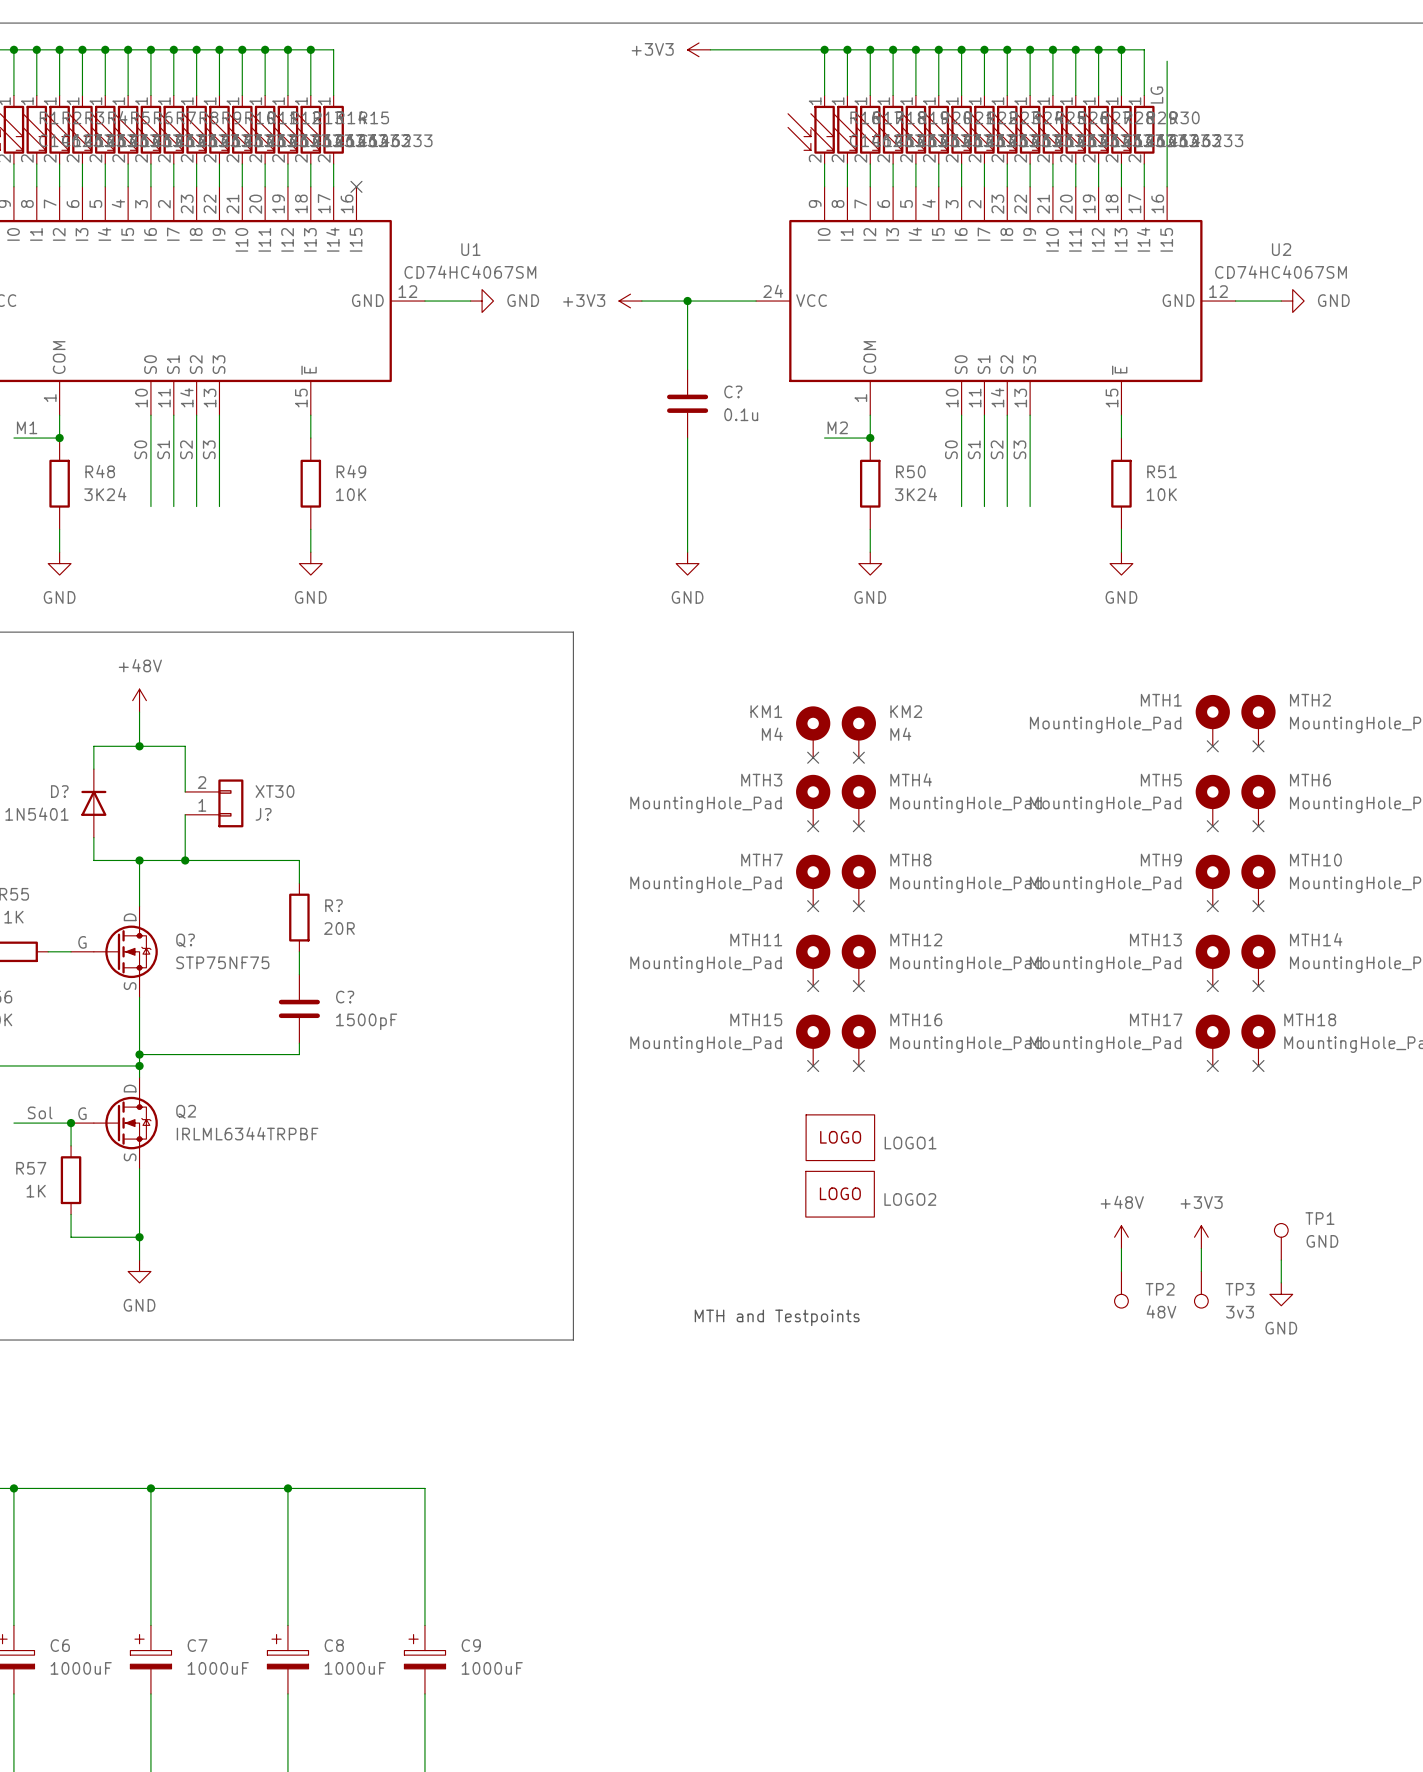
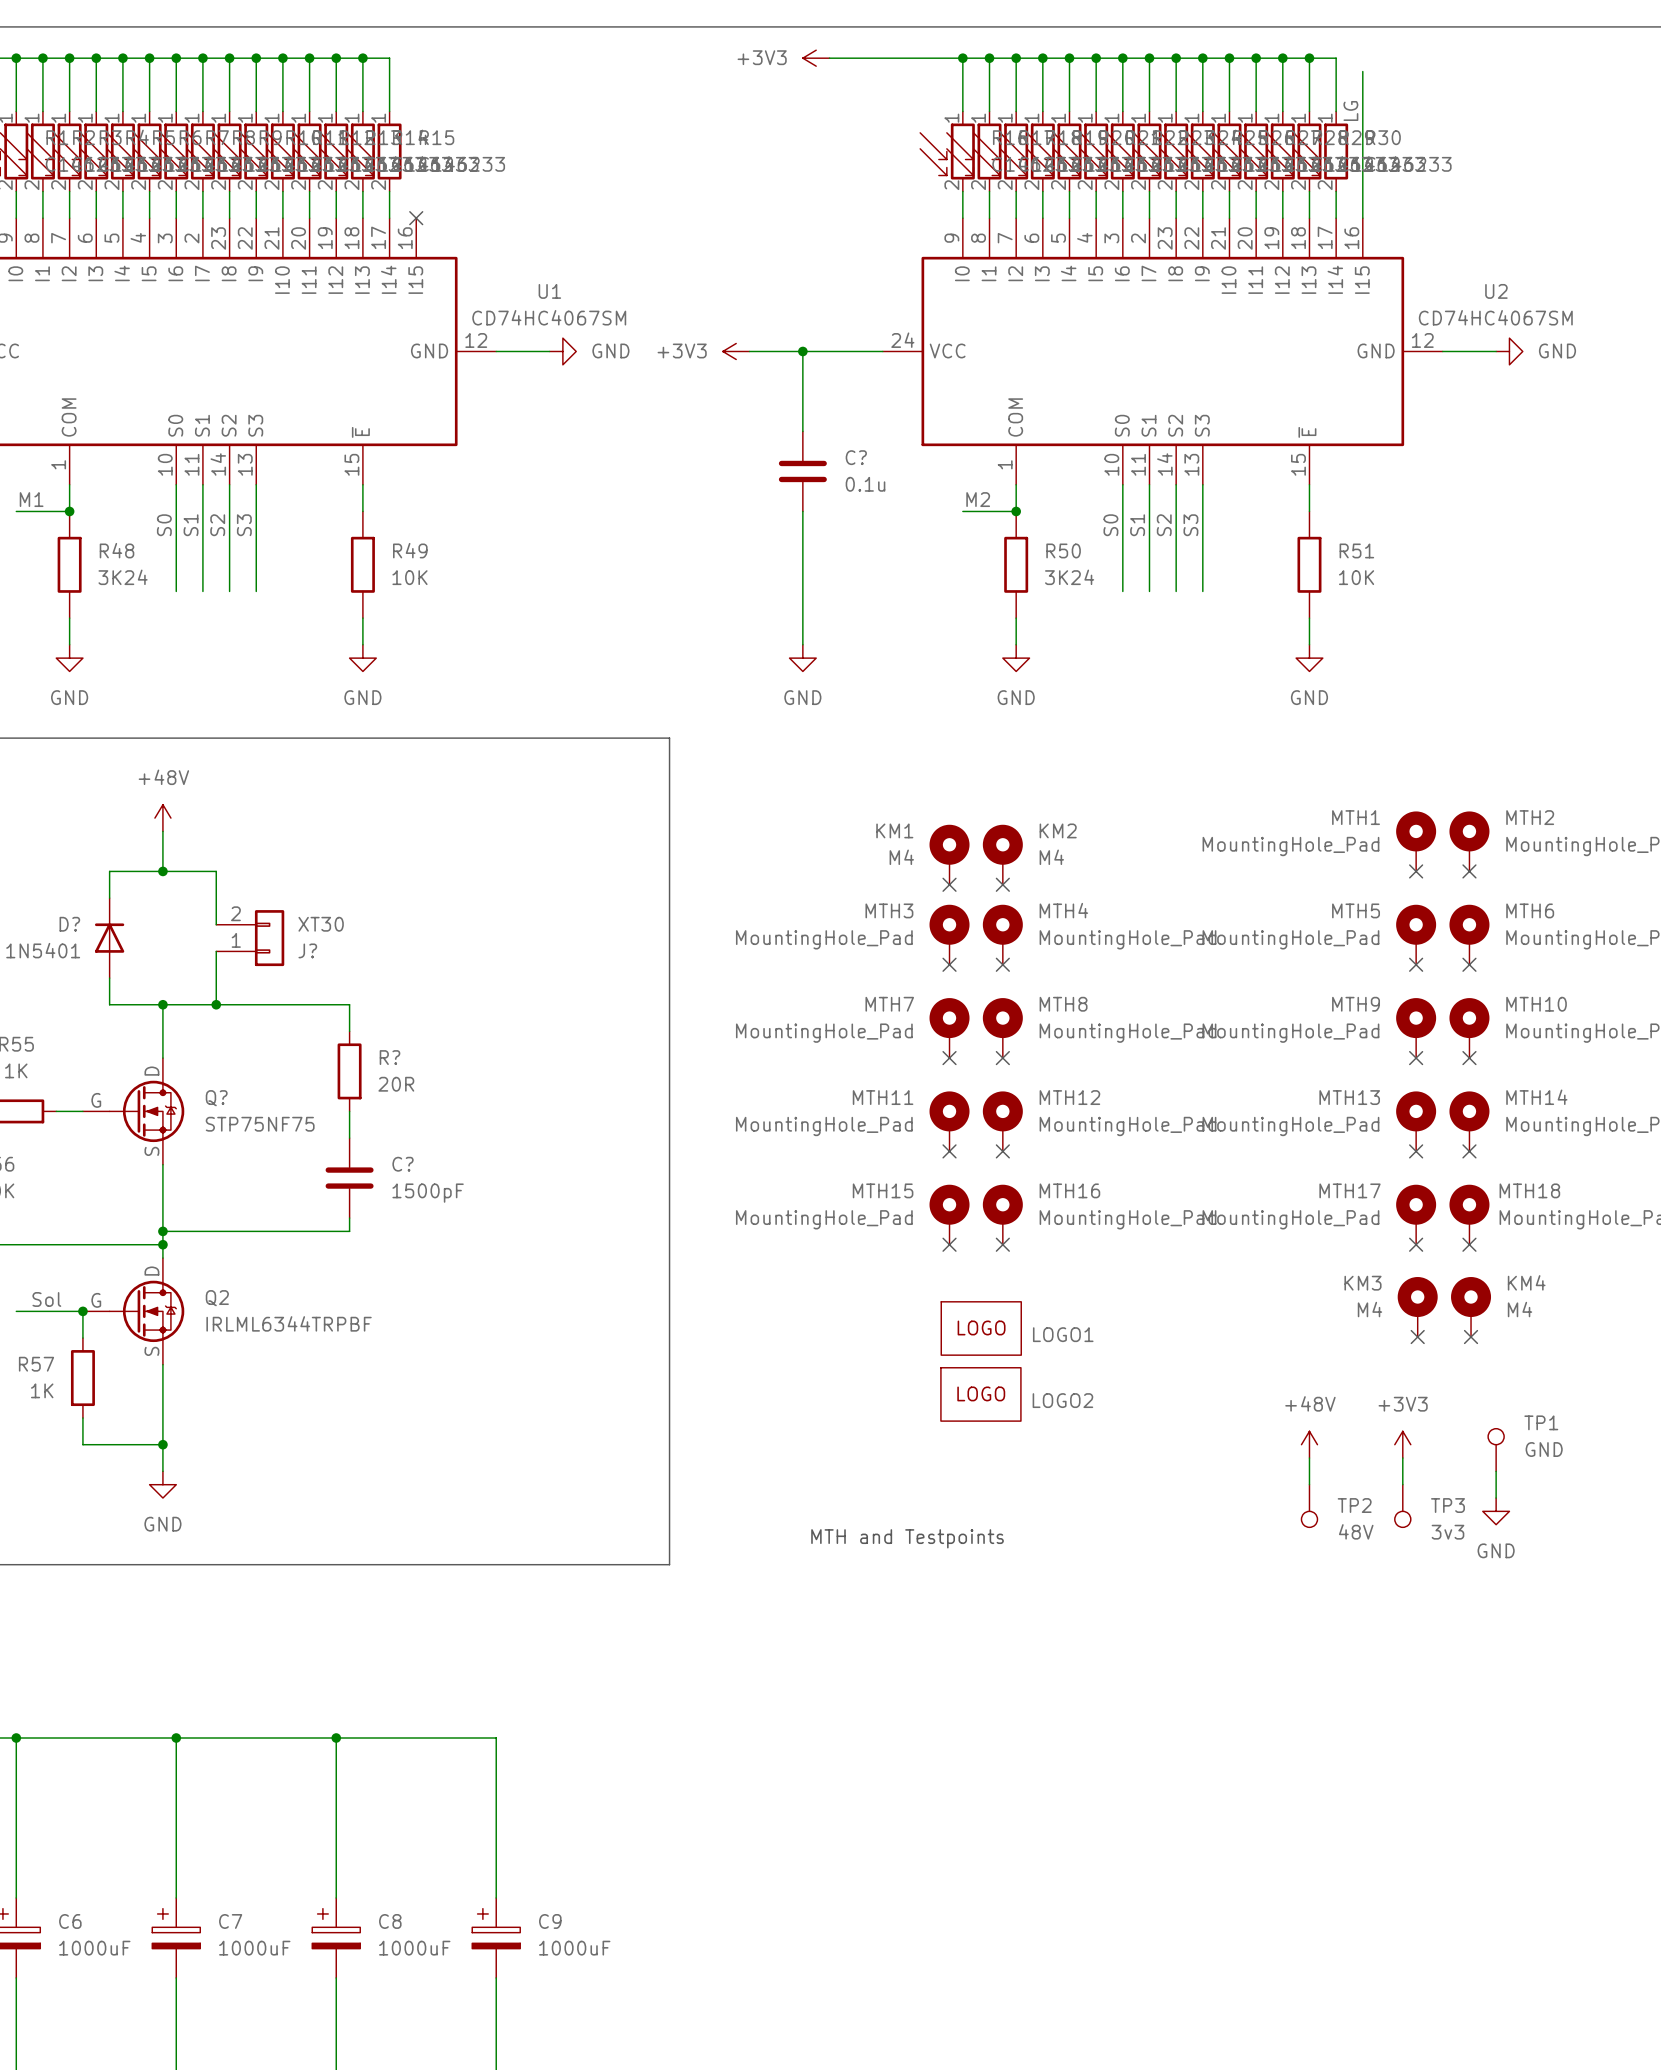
KM3: none -> M4 (1417, 1307)
KM4: none -> M4 (1471, 1307)
no-connect mark: none -> (1417, 1337)
no-connect mark: none -> (1471, 1337)

